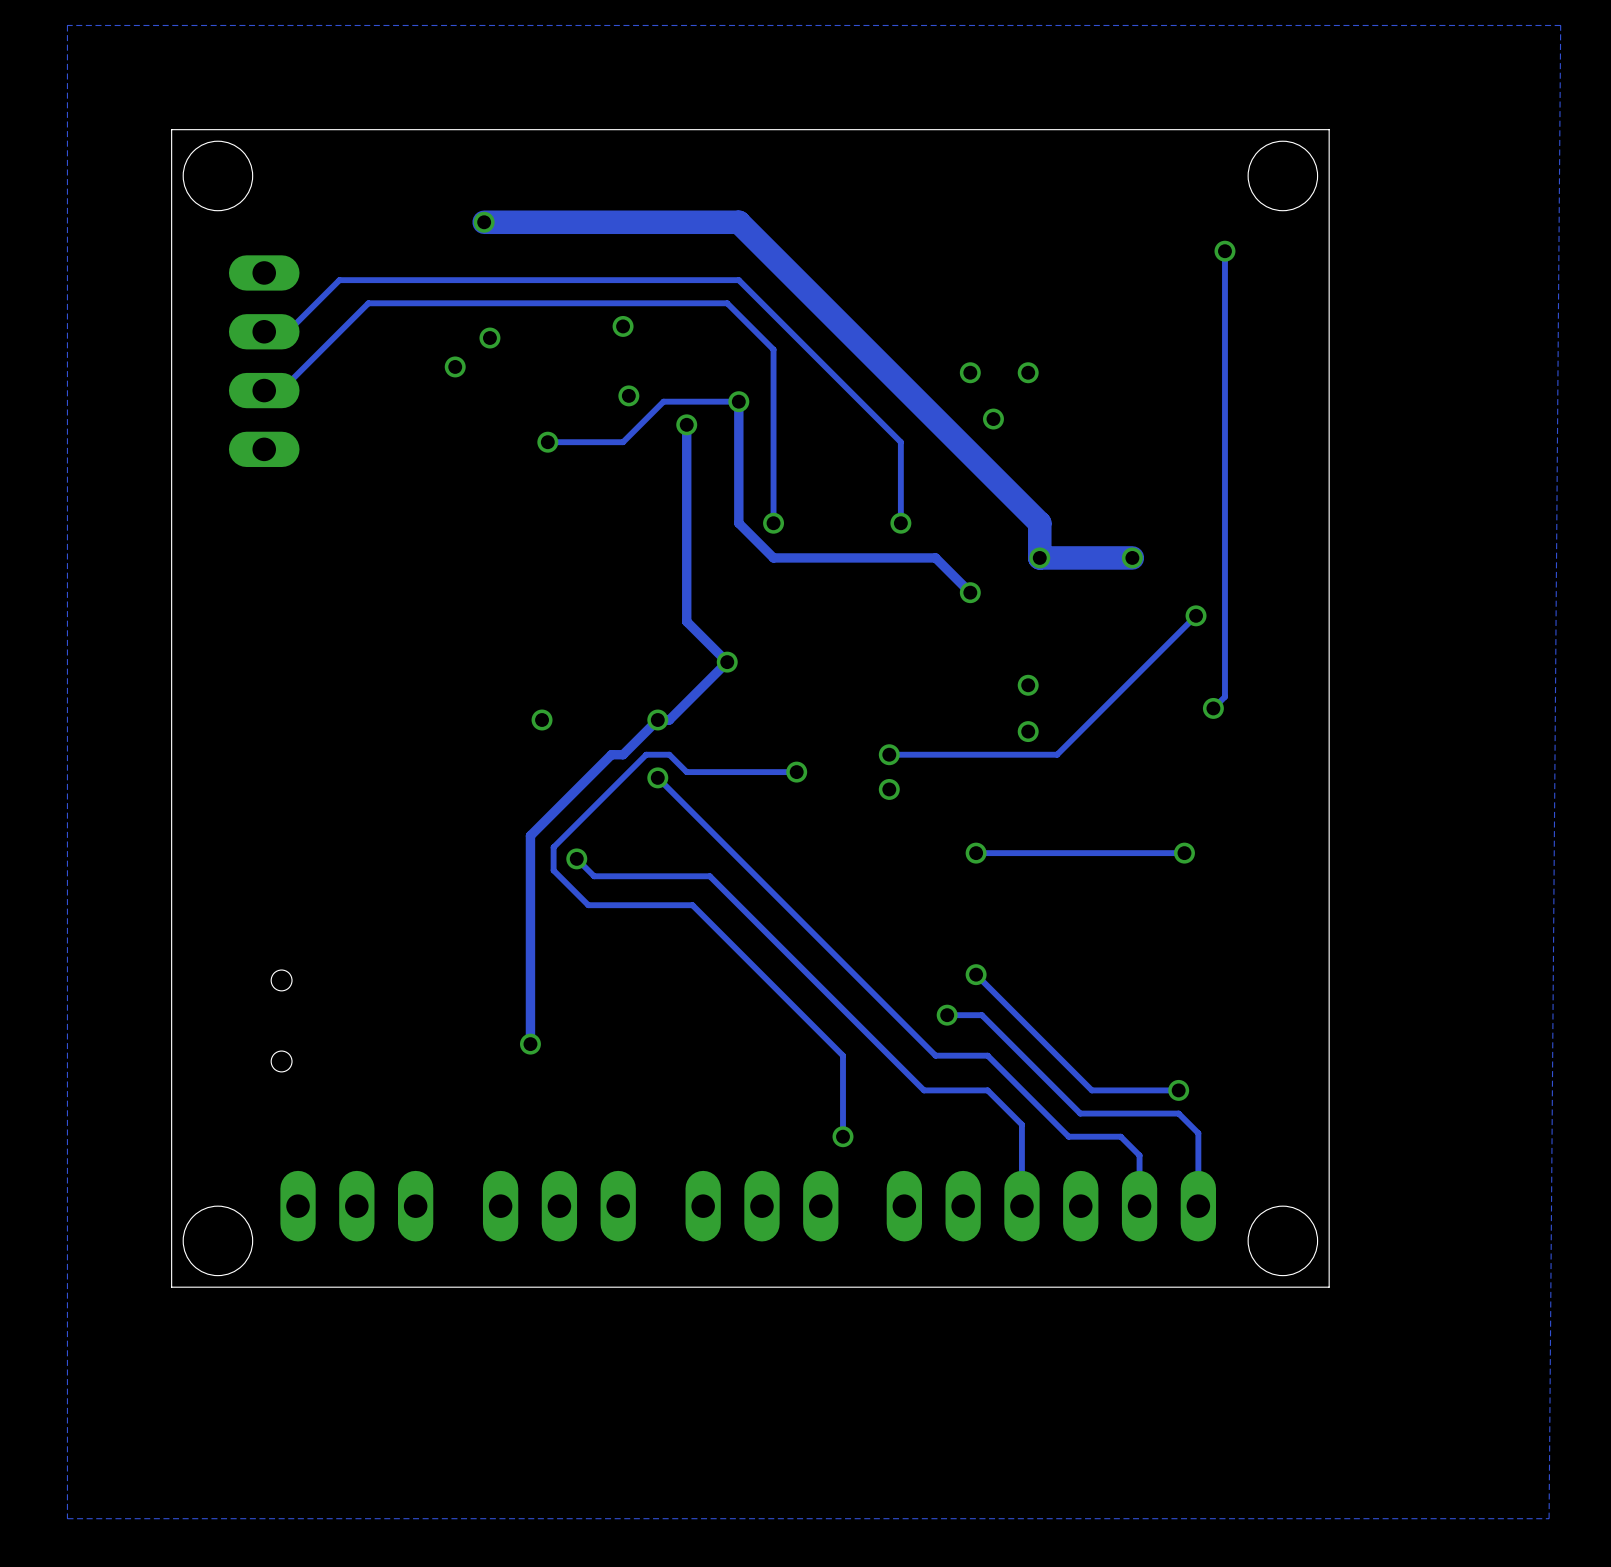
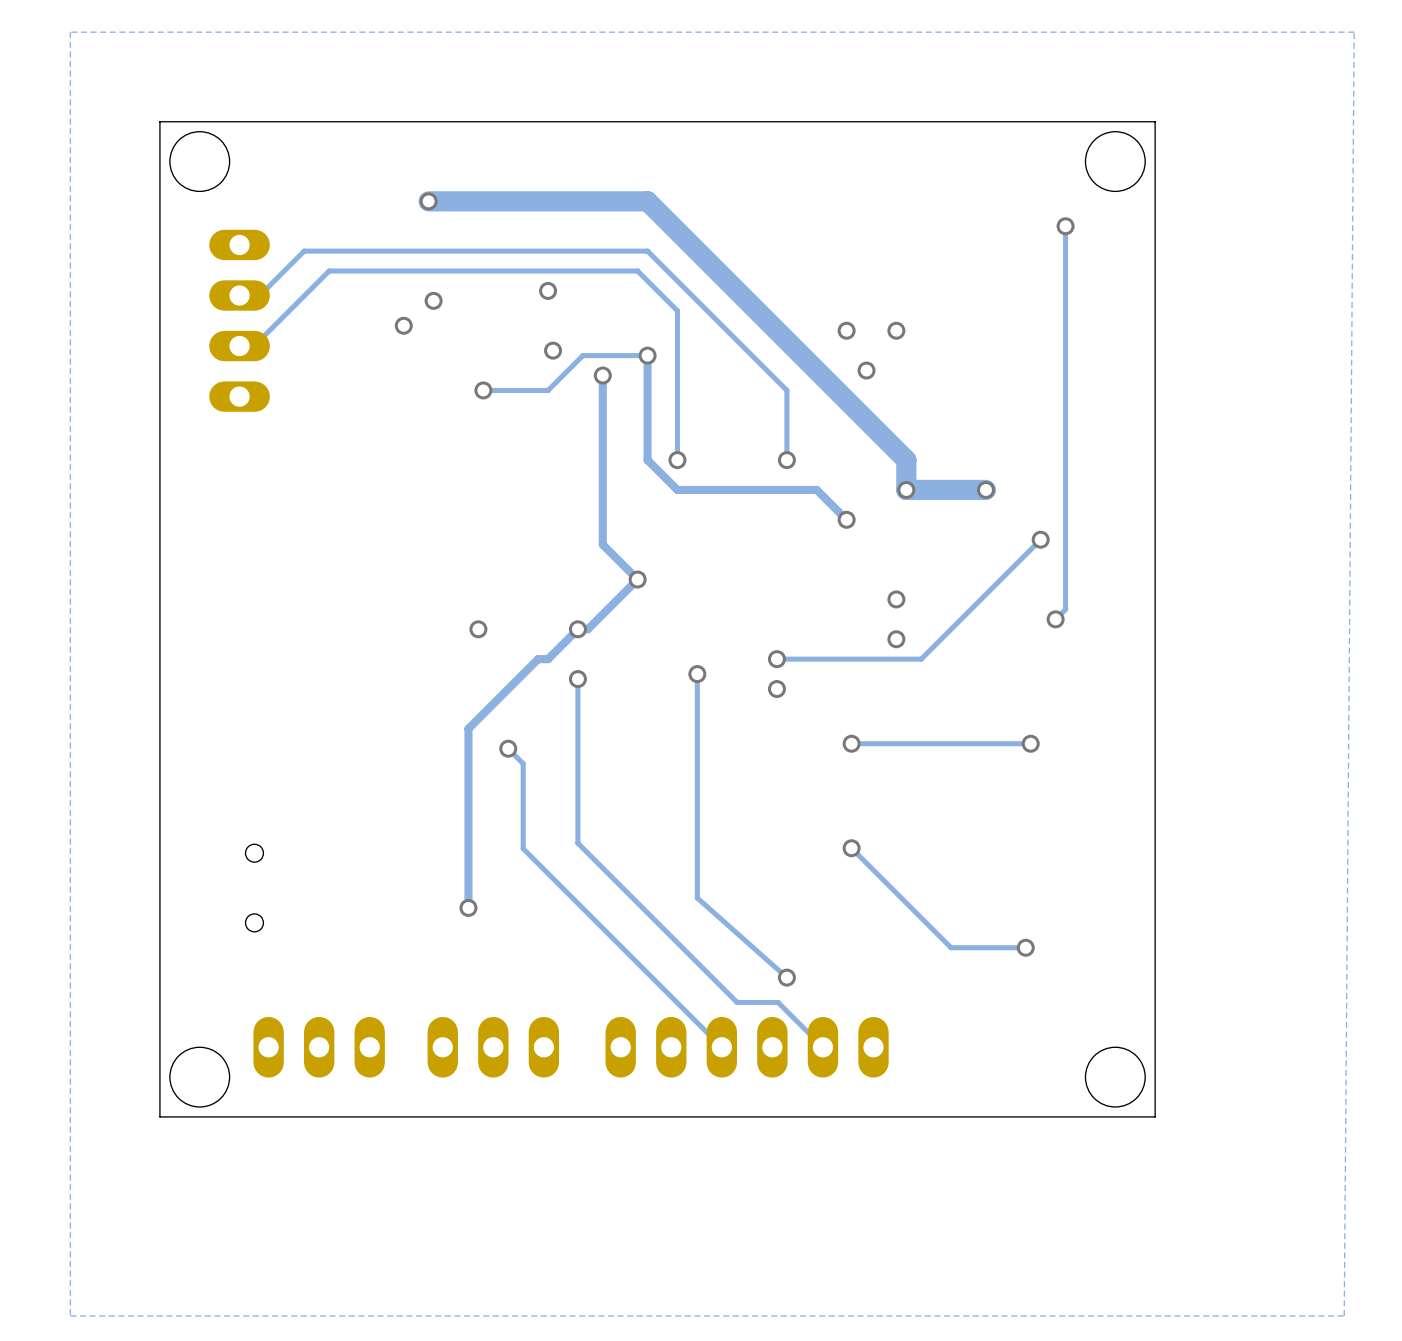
track: (796, 772) (686, 772) (669, 754) (646, 754) (553, 847) (553, 870) (588, 905) (692, 905) (842, 1055) (842, 1136) -> (697, 674) (697, 898) (786, 977)
track: (657, 777) (935, 1055) (987, 1055) (1068, 1136) (1120, 1136) (1139, 1155) (1139, 1206) -> (577, 679) (577, 843) (737, 1002) (778, 1002) (822, 1047)
track: (594, 876) (709, 876) (924, 1090) (987, 1090) (1021, 1124) (1021, 1206) -> (523, 763) (523, 848) (721, 1047)
track: (947, 1015) (981, 1015) (1080, 1113) (1178, 1113) (1198, 1133) (1198, 1206) -> none
via: (947, 1015) -> none
via position: (842, 1136) -> (786, 977)
part: (761, 1206) -> none
part position: (1051, 1206) -> (747, 1047)

